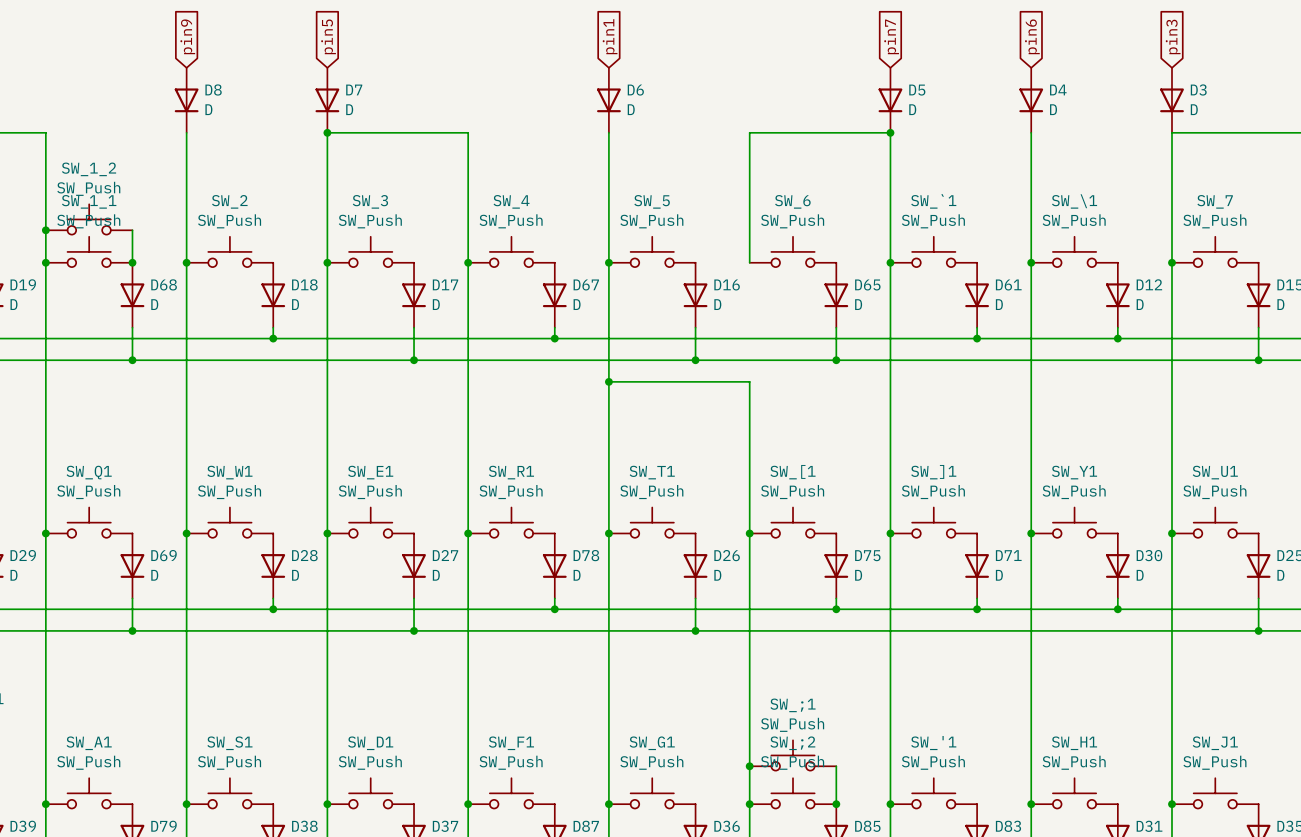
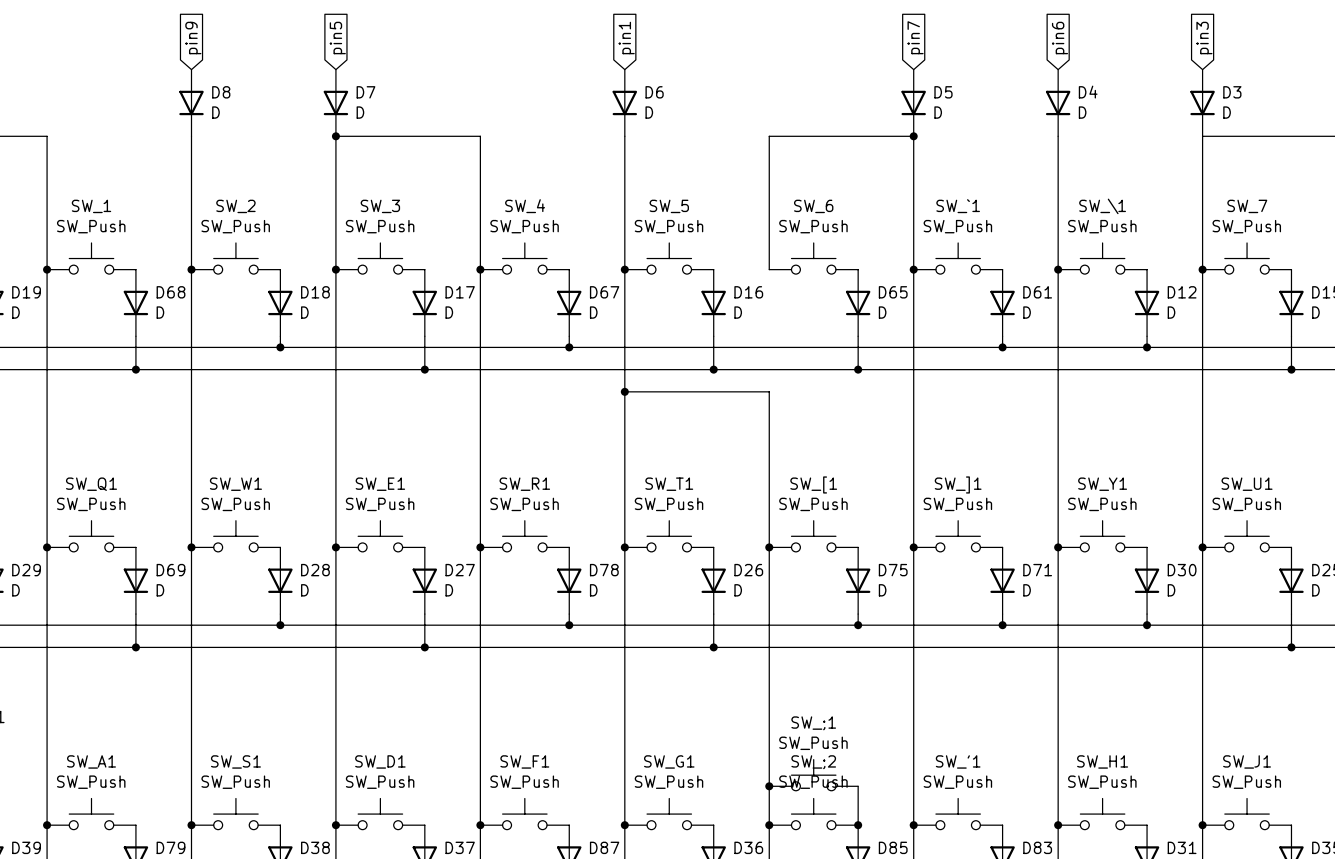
SW_1_1 name: SW_1_1 (89, 201) -> SW_1 (91, 206)
SW_1_2: SW_Push (89, 219) -> none
junction: (45, 230) -> none
wire: (132, 230) (132, 262) -> none
junction: (132, 262) -> none

